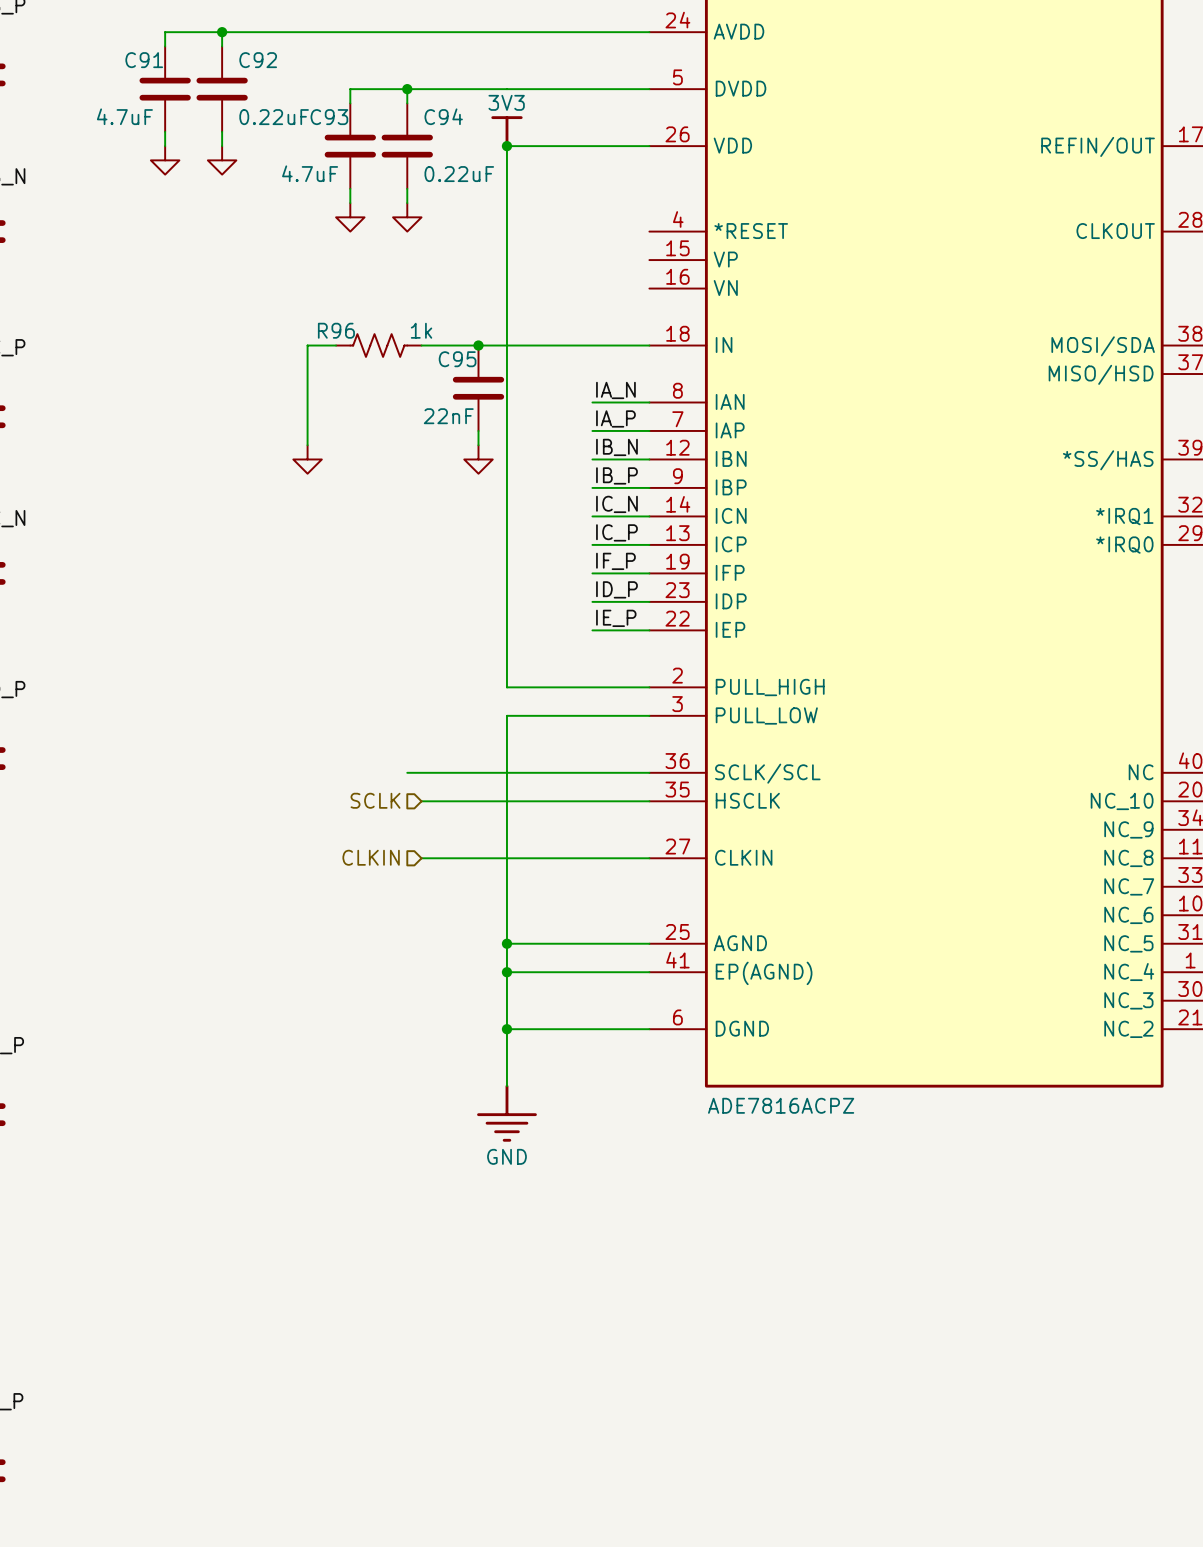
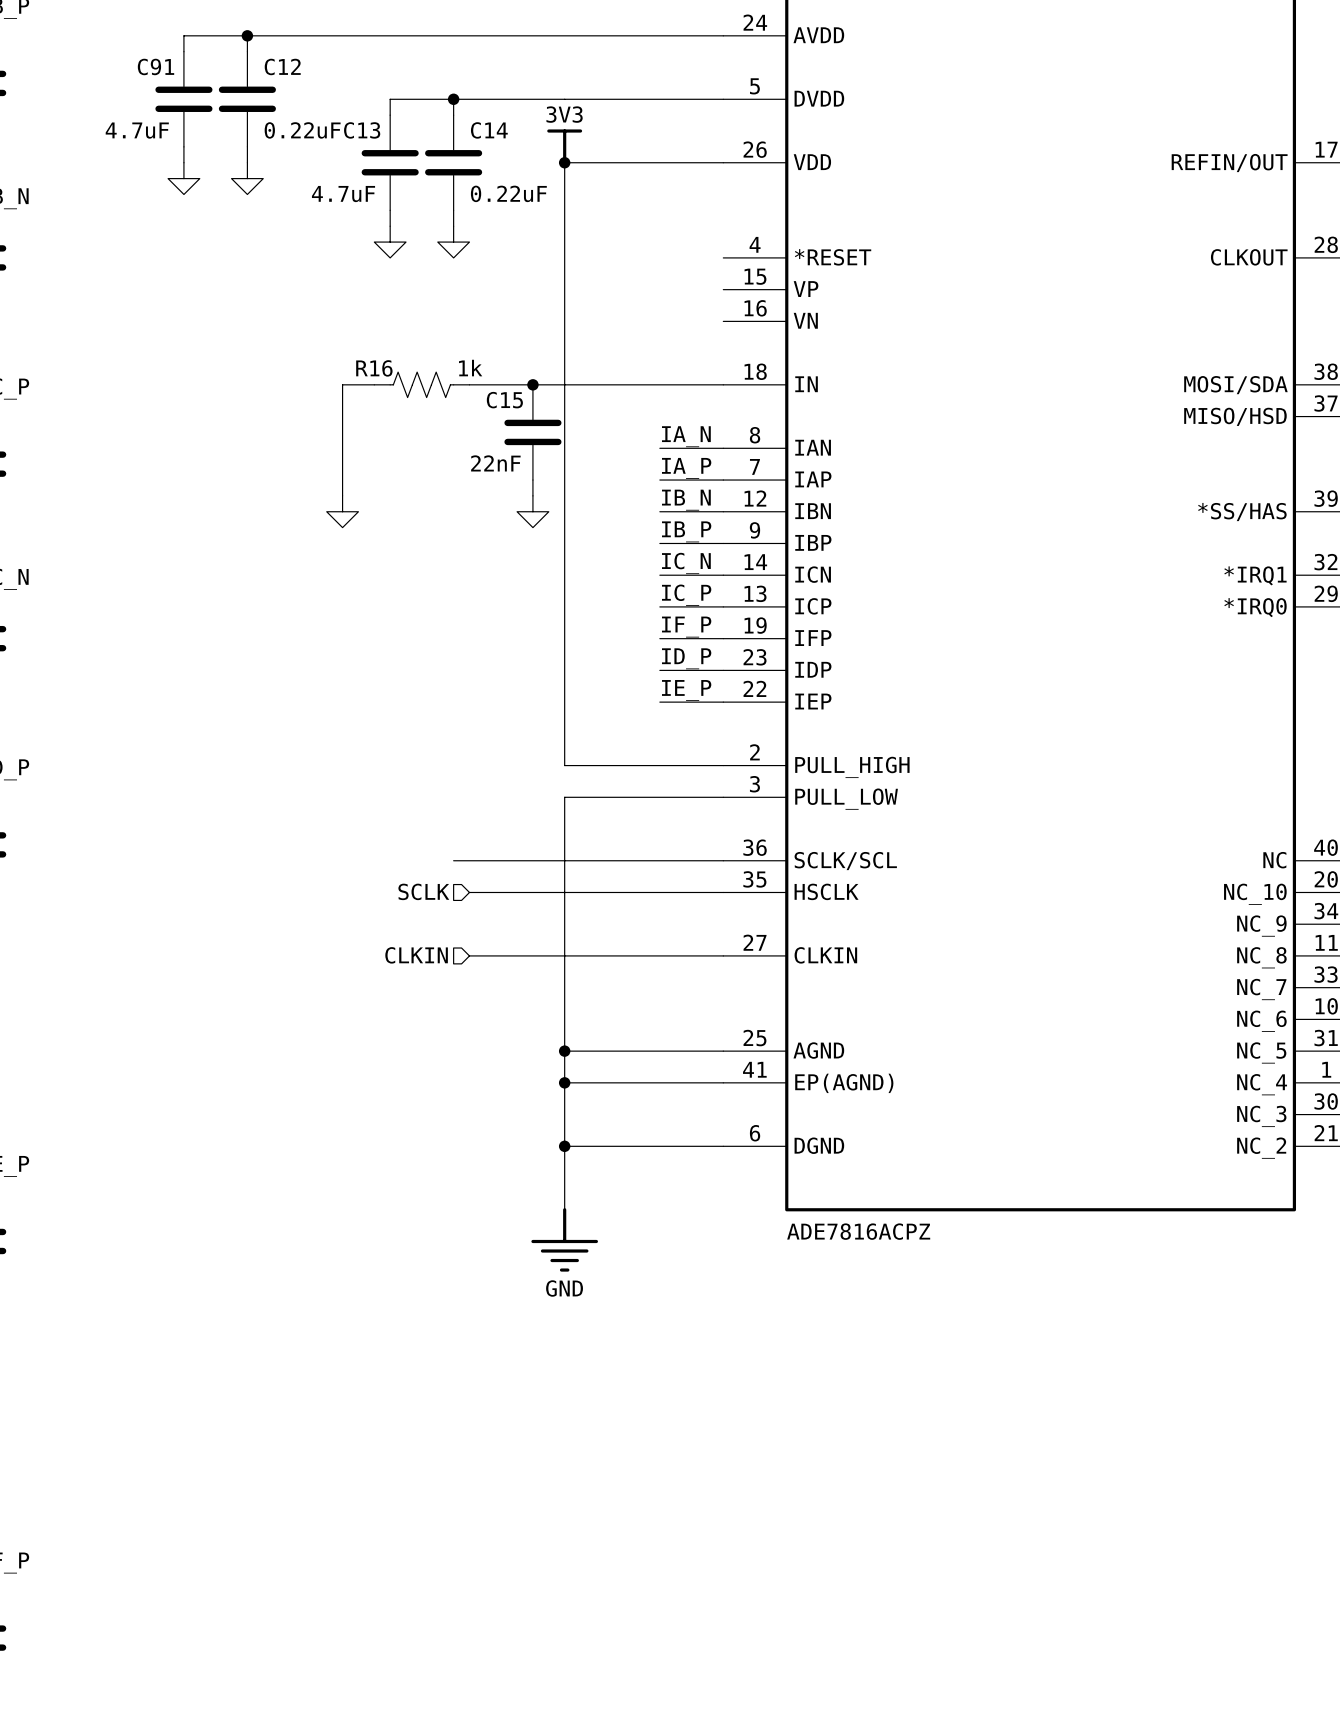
C92 name: C92 (258, 60) -> C12 (282, 66)
C94 name: C94 (443, 116) -> C14 (489, 130)
C93 name: C93 (329, 117) -> C13 (362, 130)
R96 name: R96 (336, 330) -> R16 (374, 368)
C95 name: C95 (457, 359) -> C15 (504, 400)

